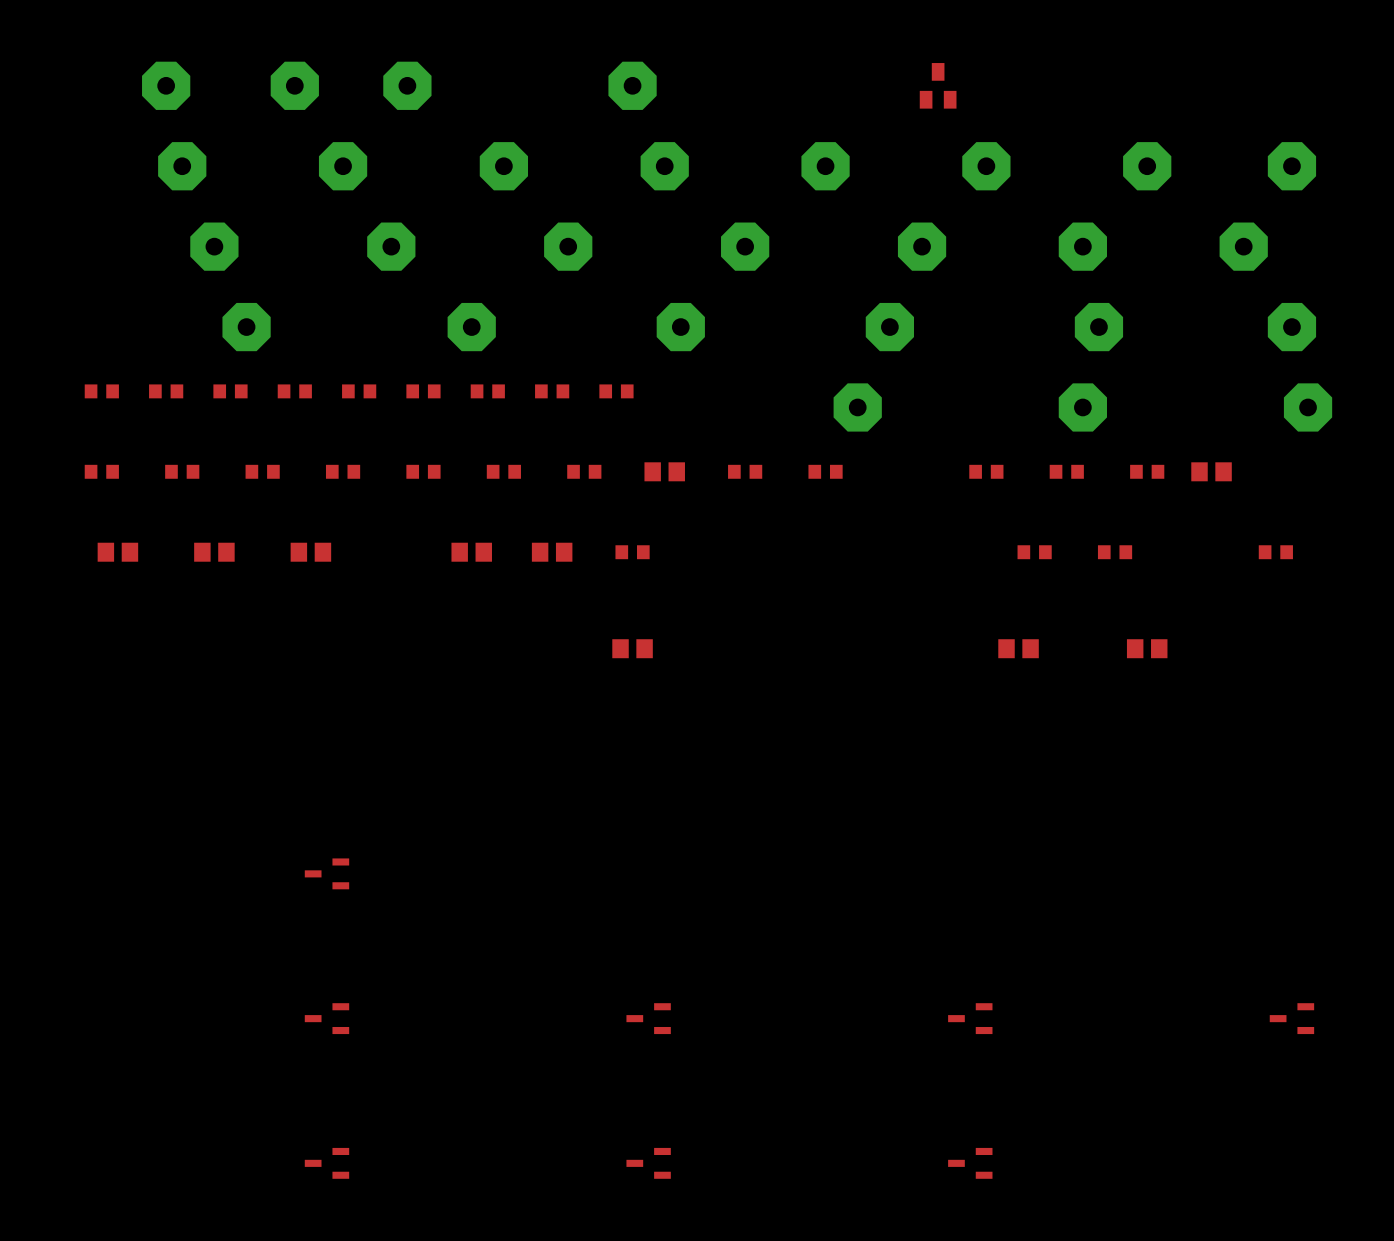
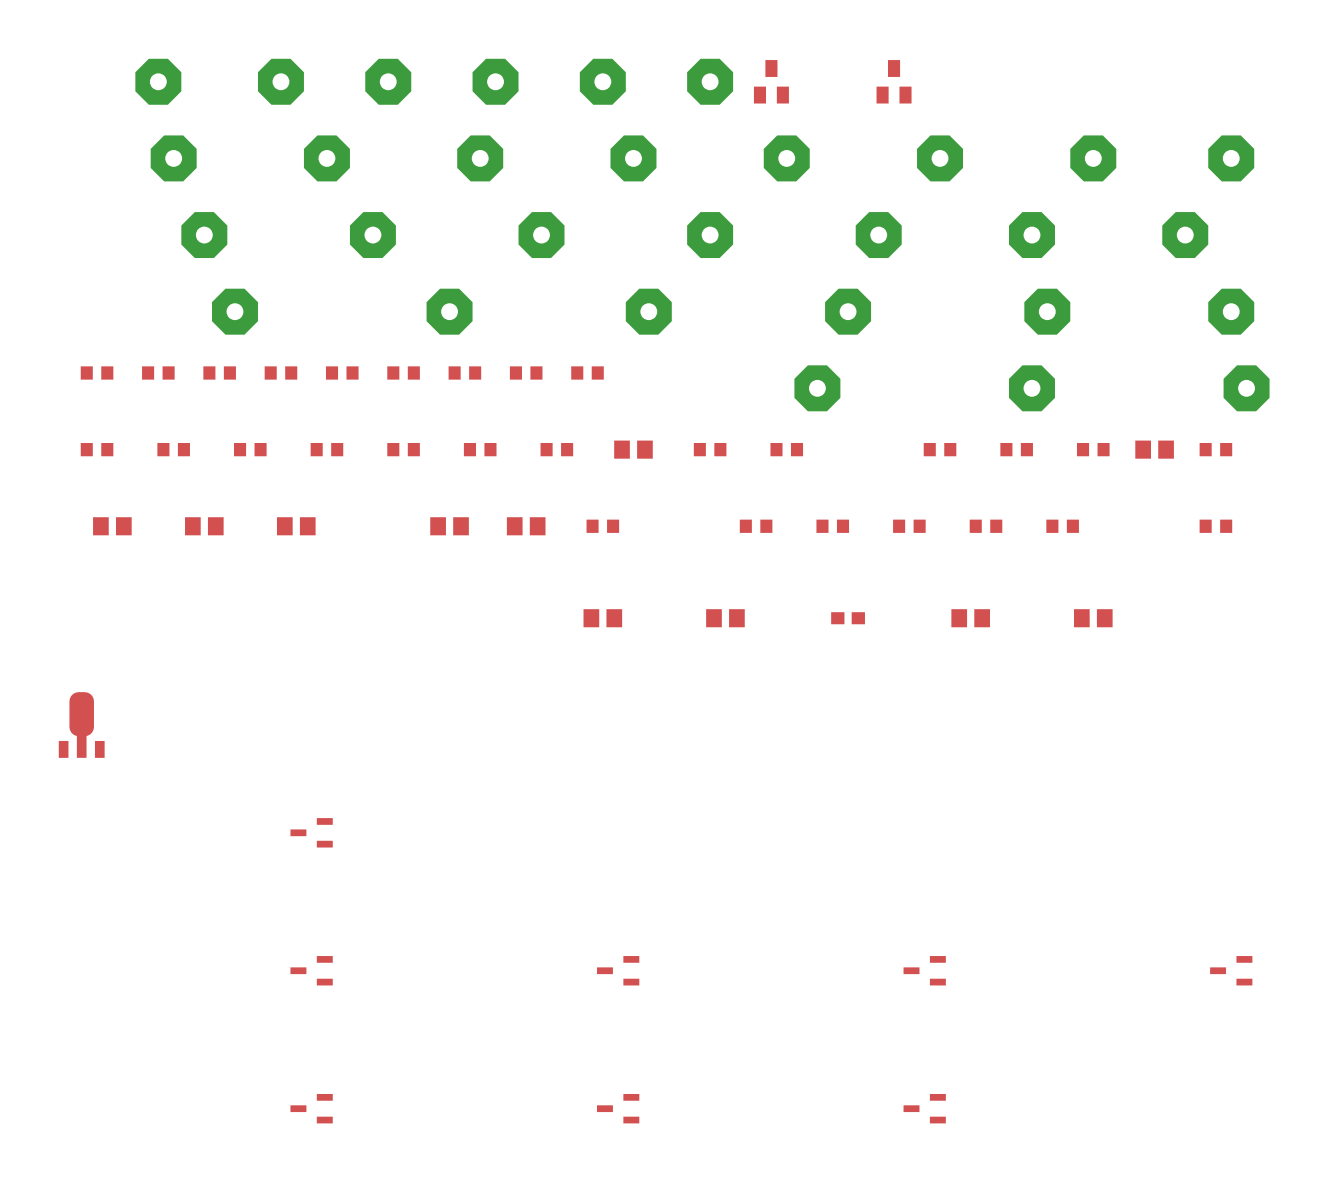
part: none -> (495, 81)
part: none -> (710, 81)
part: none -> (771, 81)
part: none -> (1215, 449)
part: none -> (756, 526)
part: none -> (832, 526)
part: none -> (909, 526)
part: none -> (725, 618)
part: none -> (848, 618)
part: none -> (81, 725)

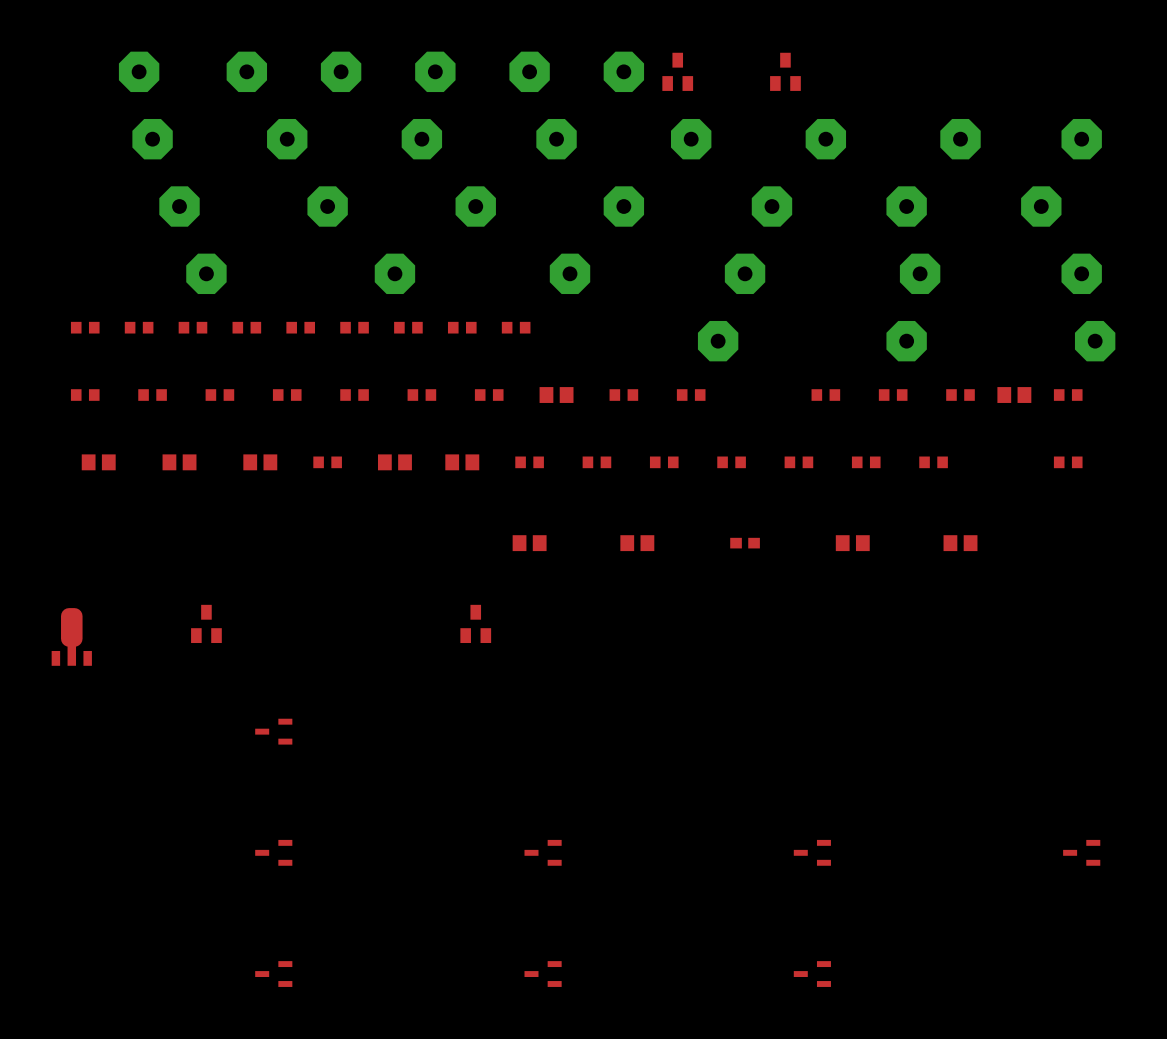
part: none -> (327, 462)
part: none -> (596, 462)
part: none -> (206, 623)
part: none -> (475, 623)

